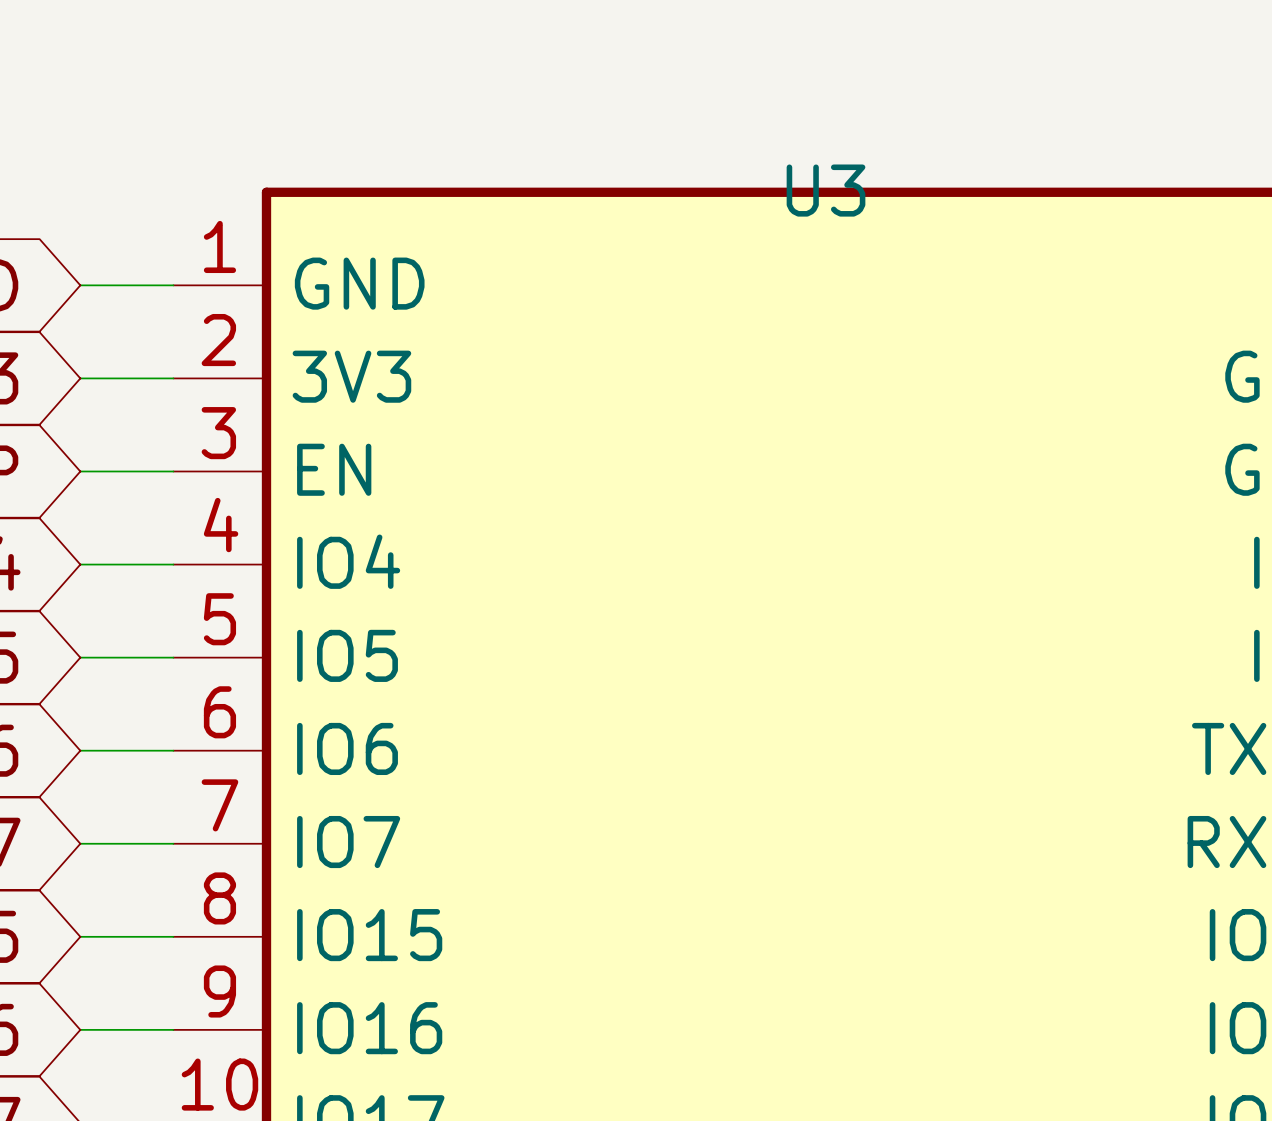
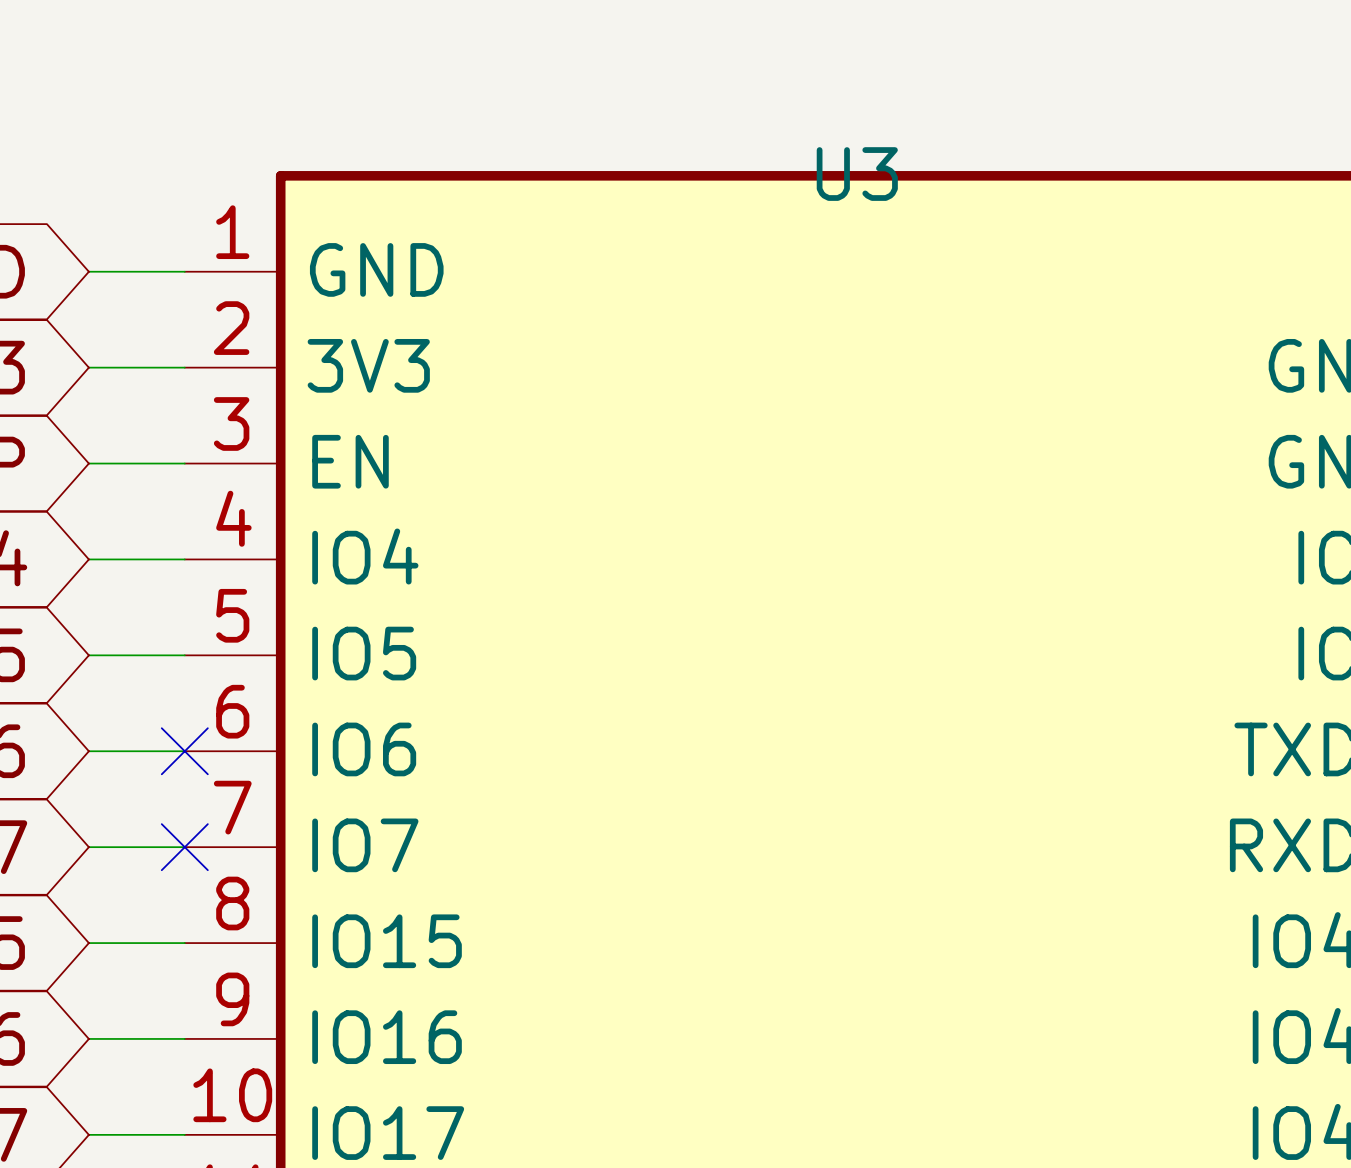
no-connect mark: none -> (184, 751)
no-connect mark: none -> (184, 847)

